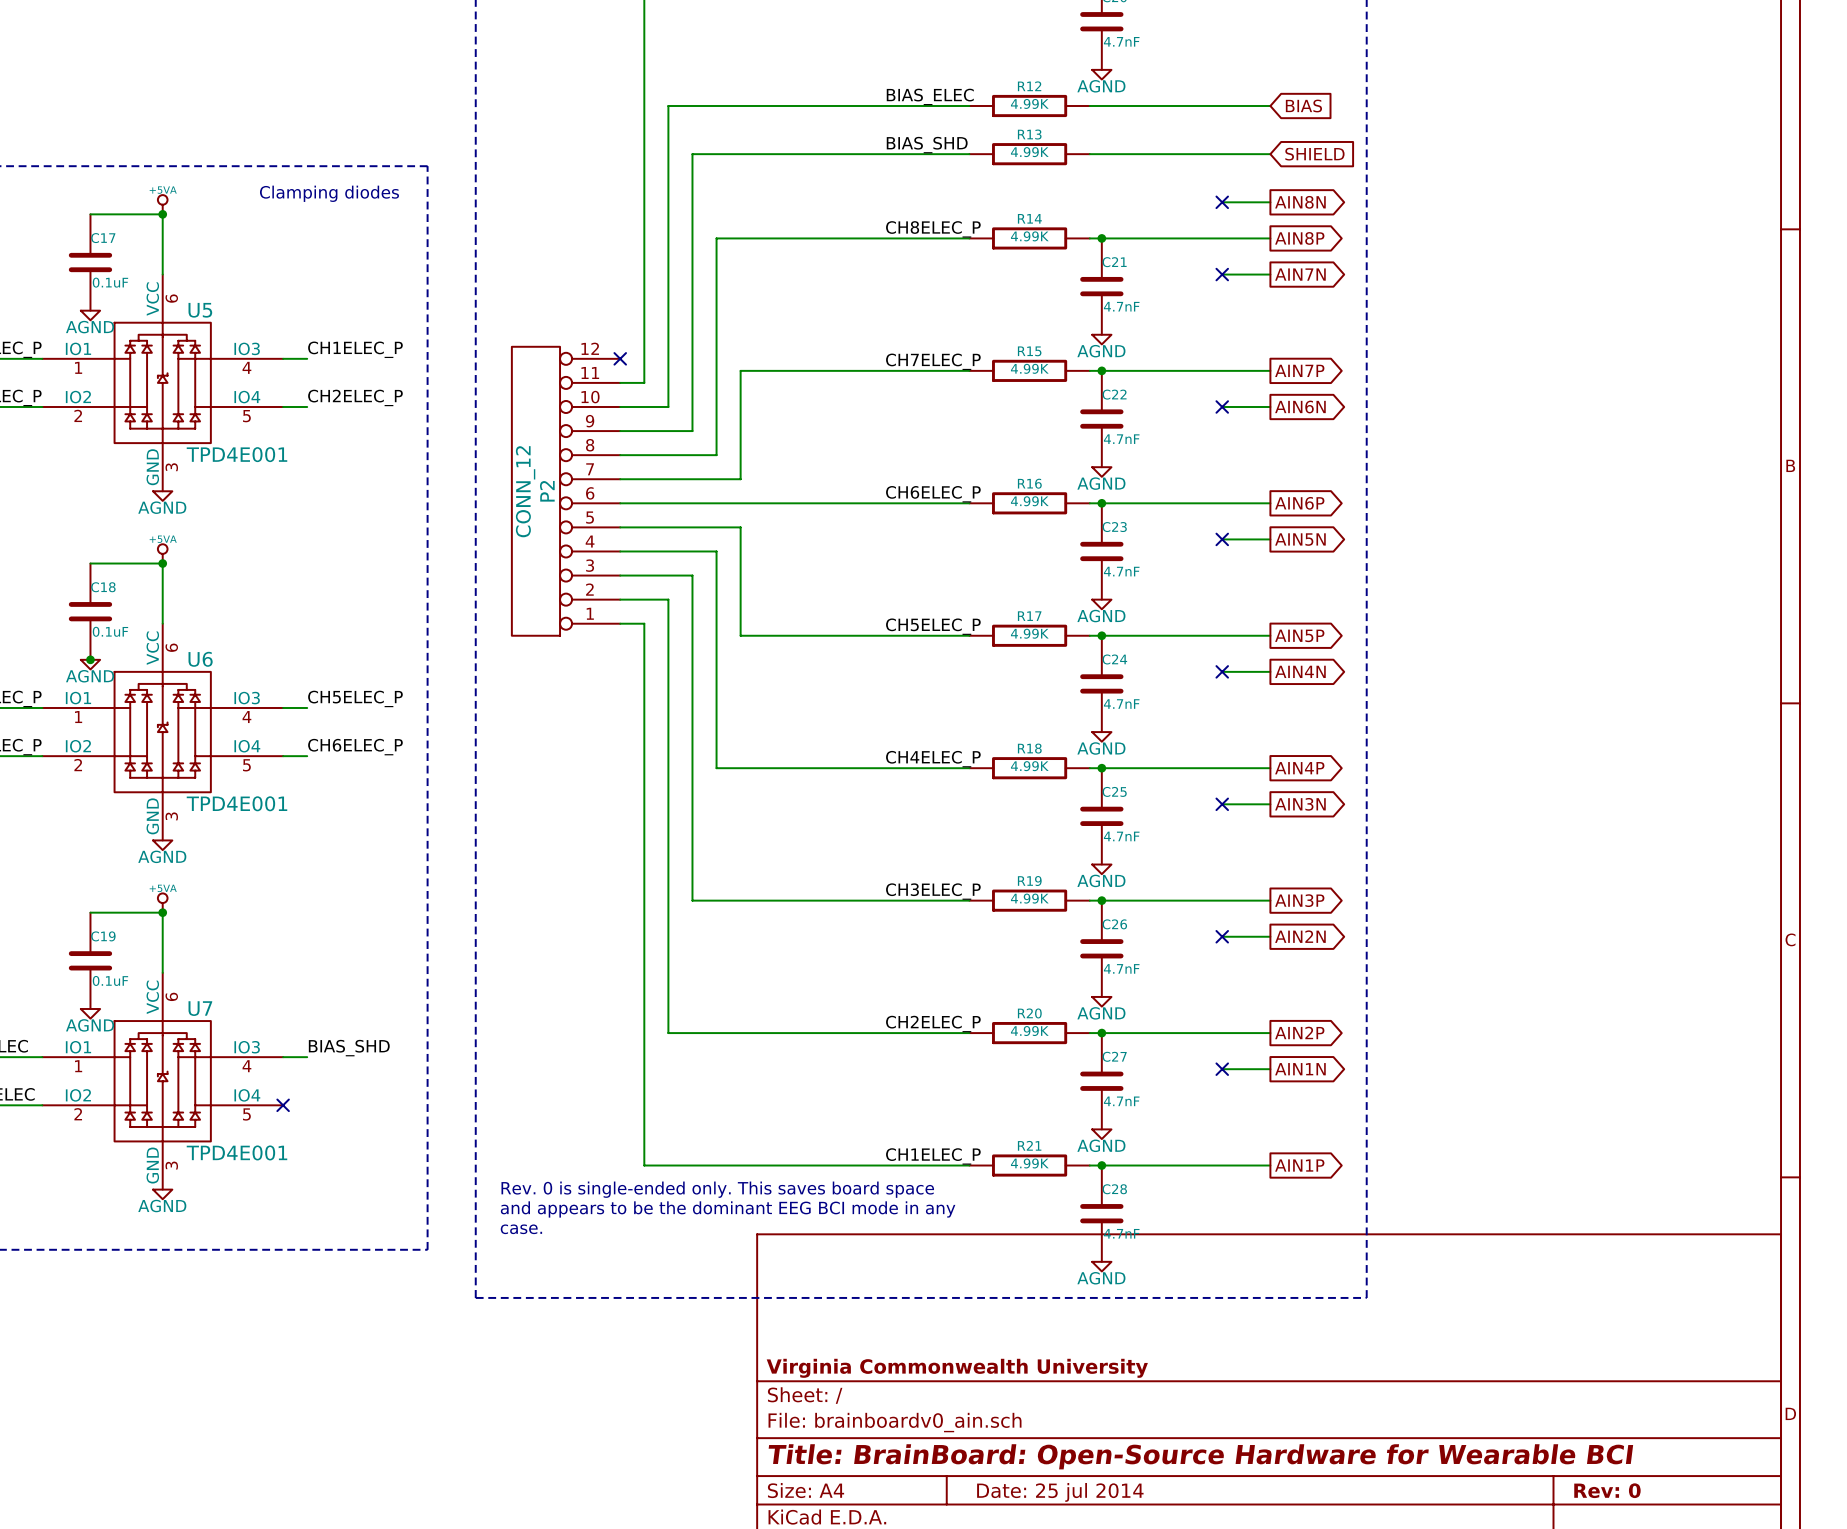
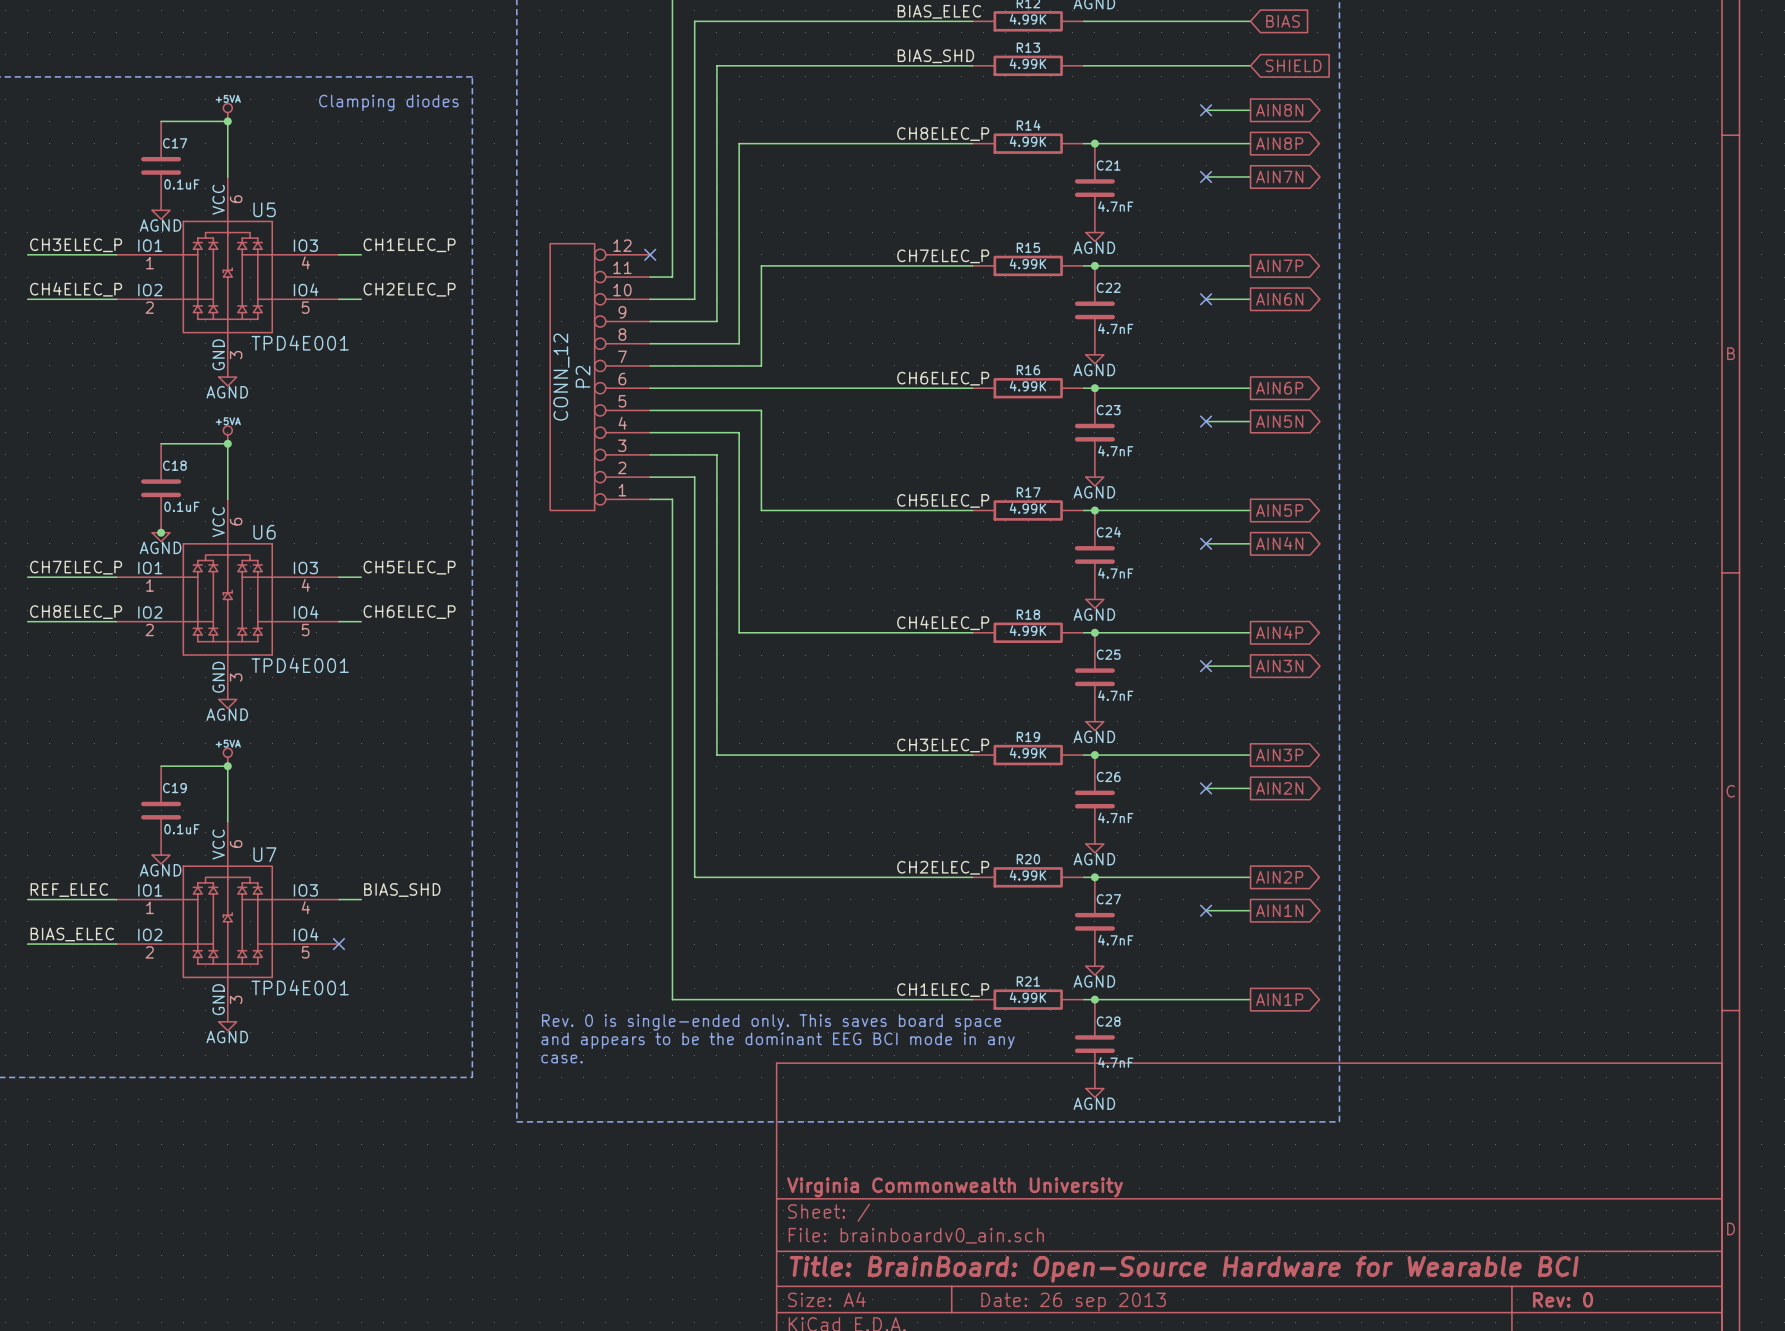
title block: Date: 25 jul 2014 (1060, 1492) -> Date: 26 sep 2013 (1073, 1302)

